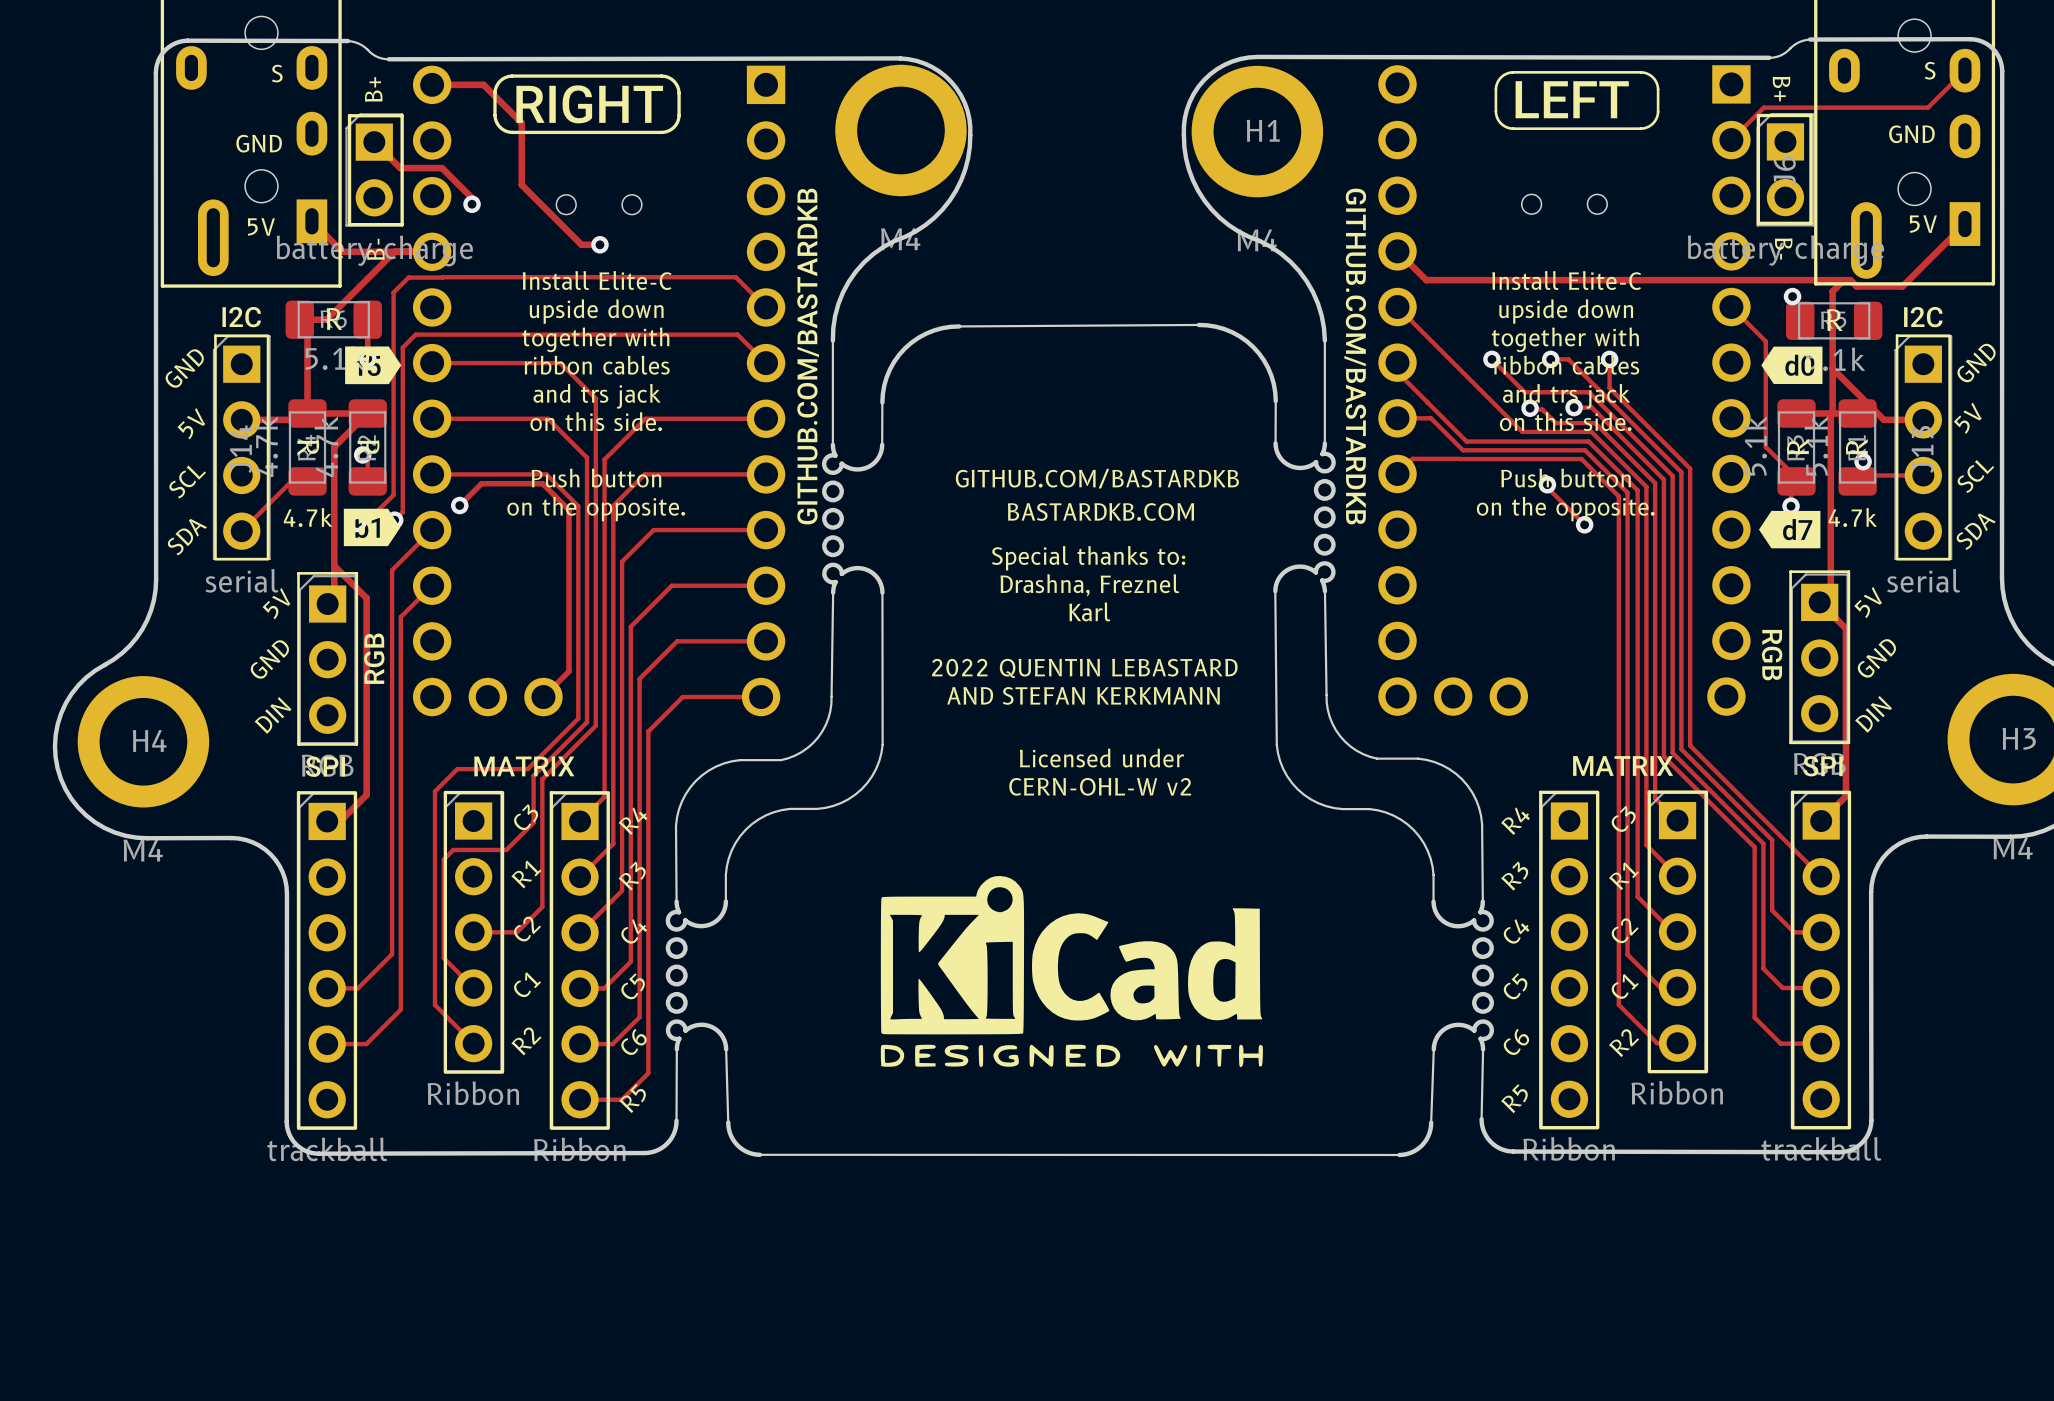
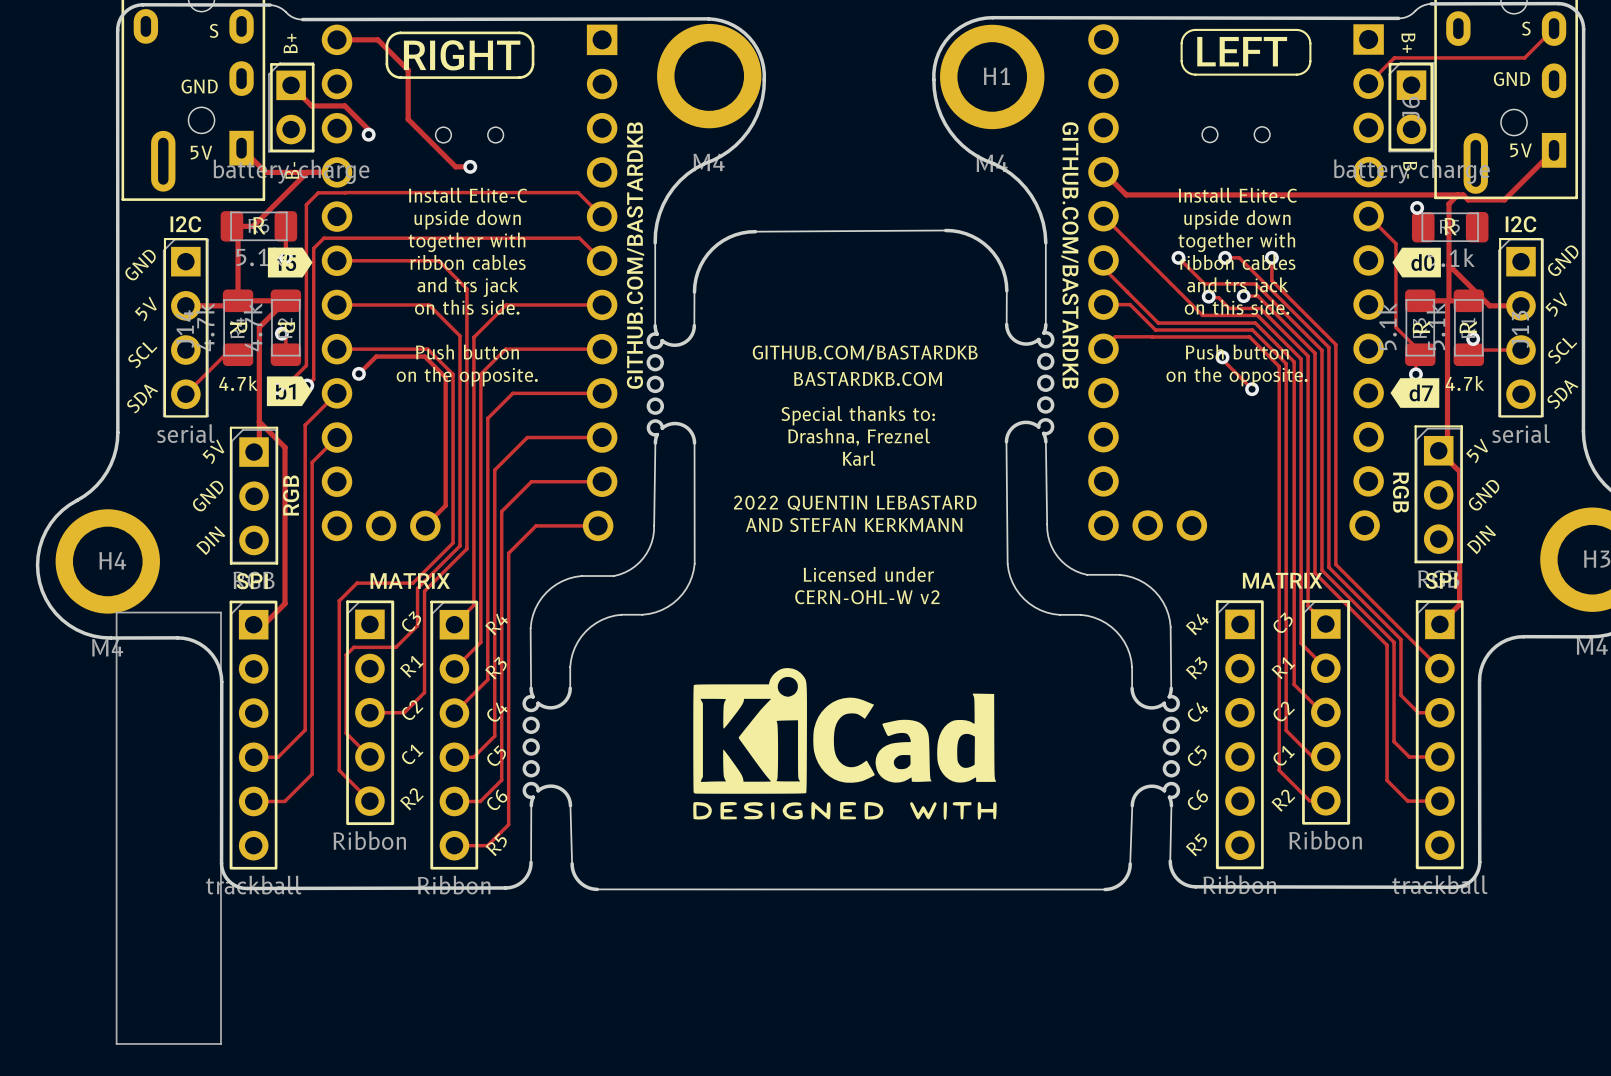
line: none -> (116, 612) (220, 612) (220, 1043) (116, 1043) (116, 612)

